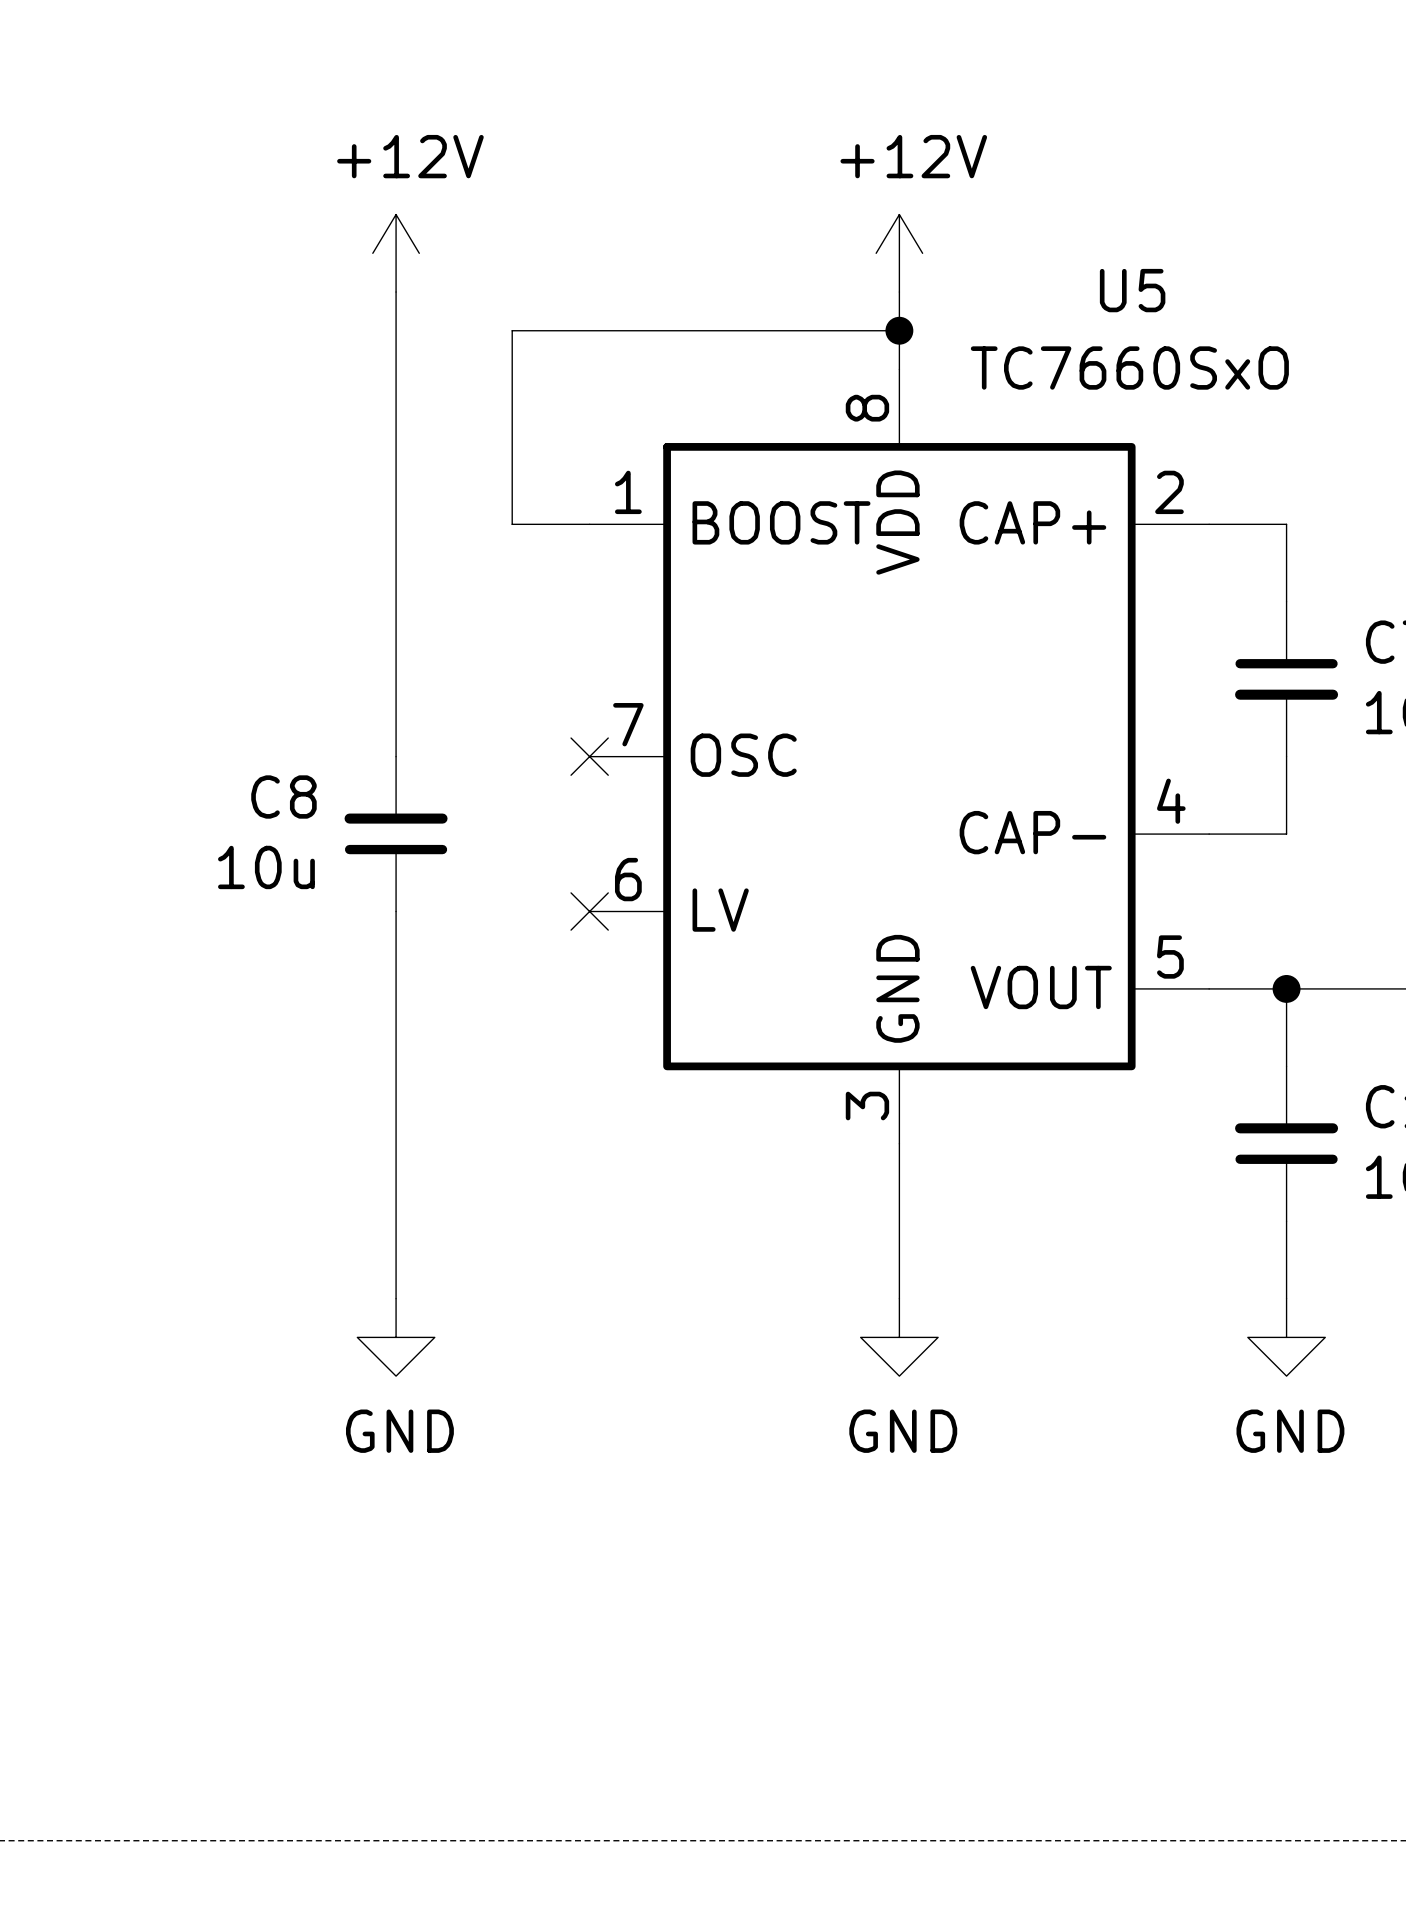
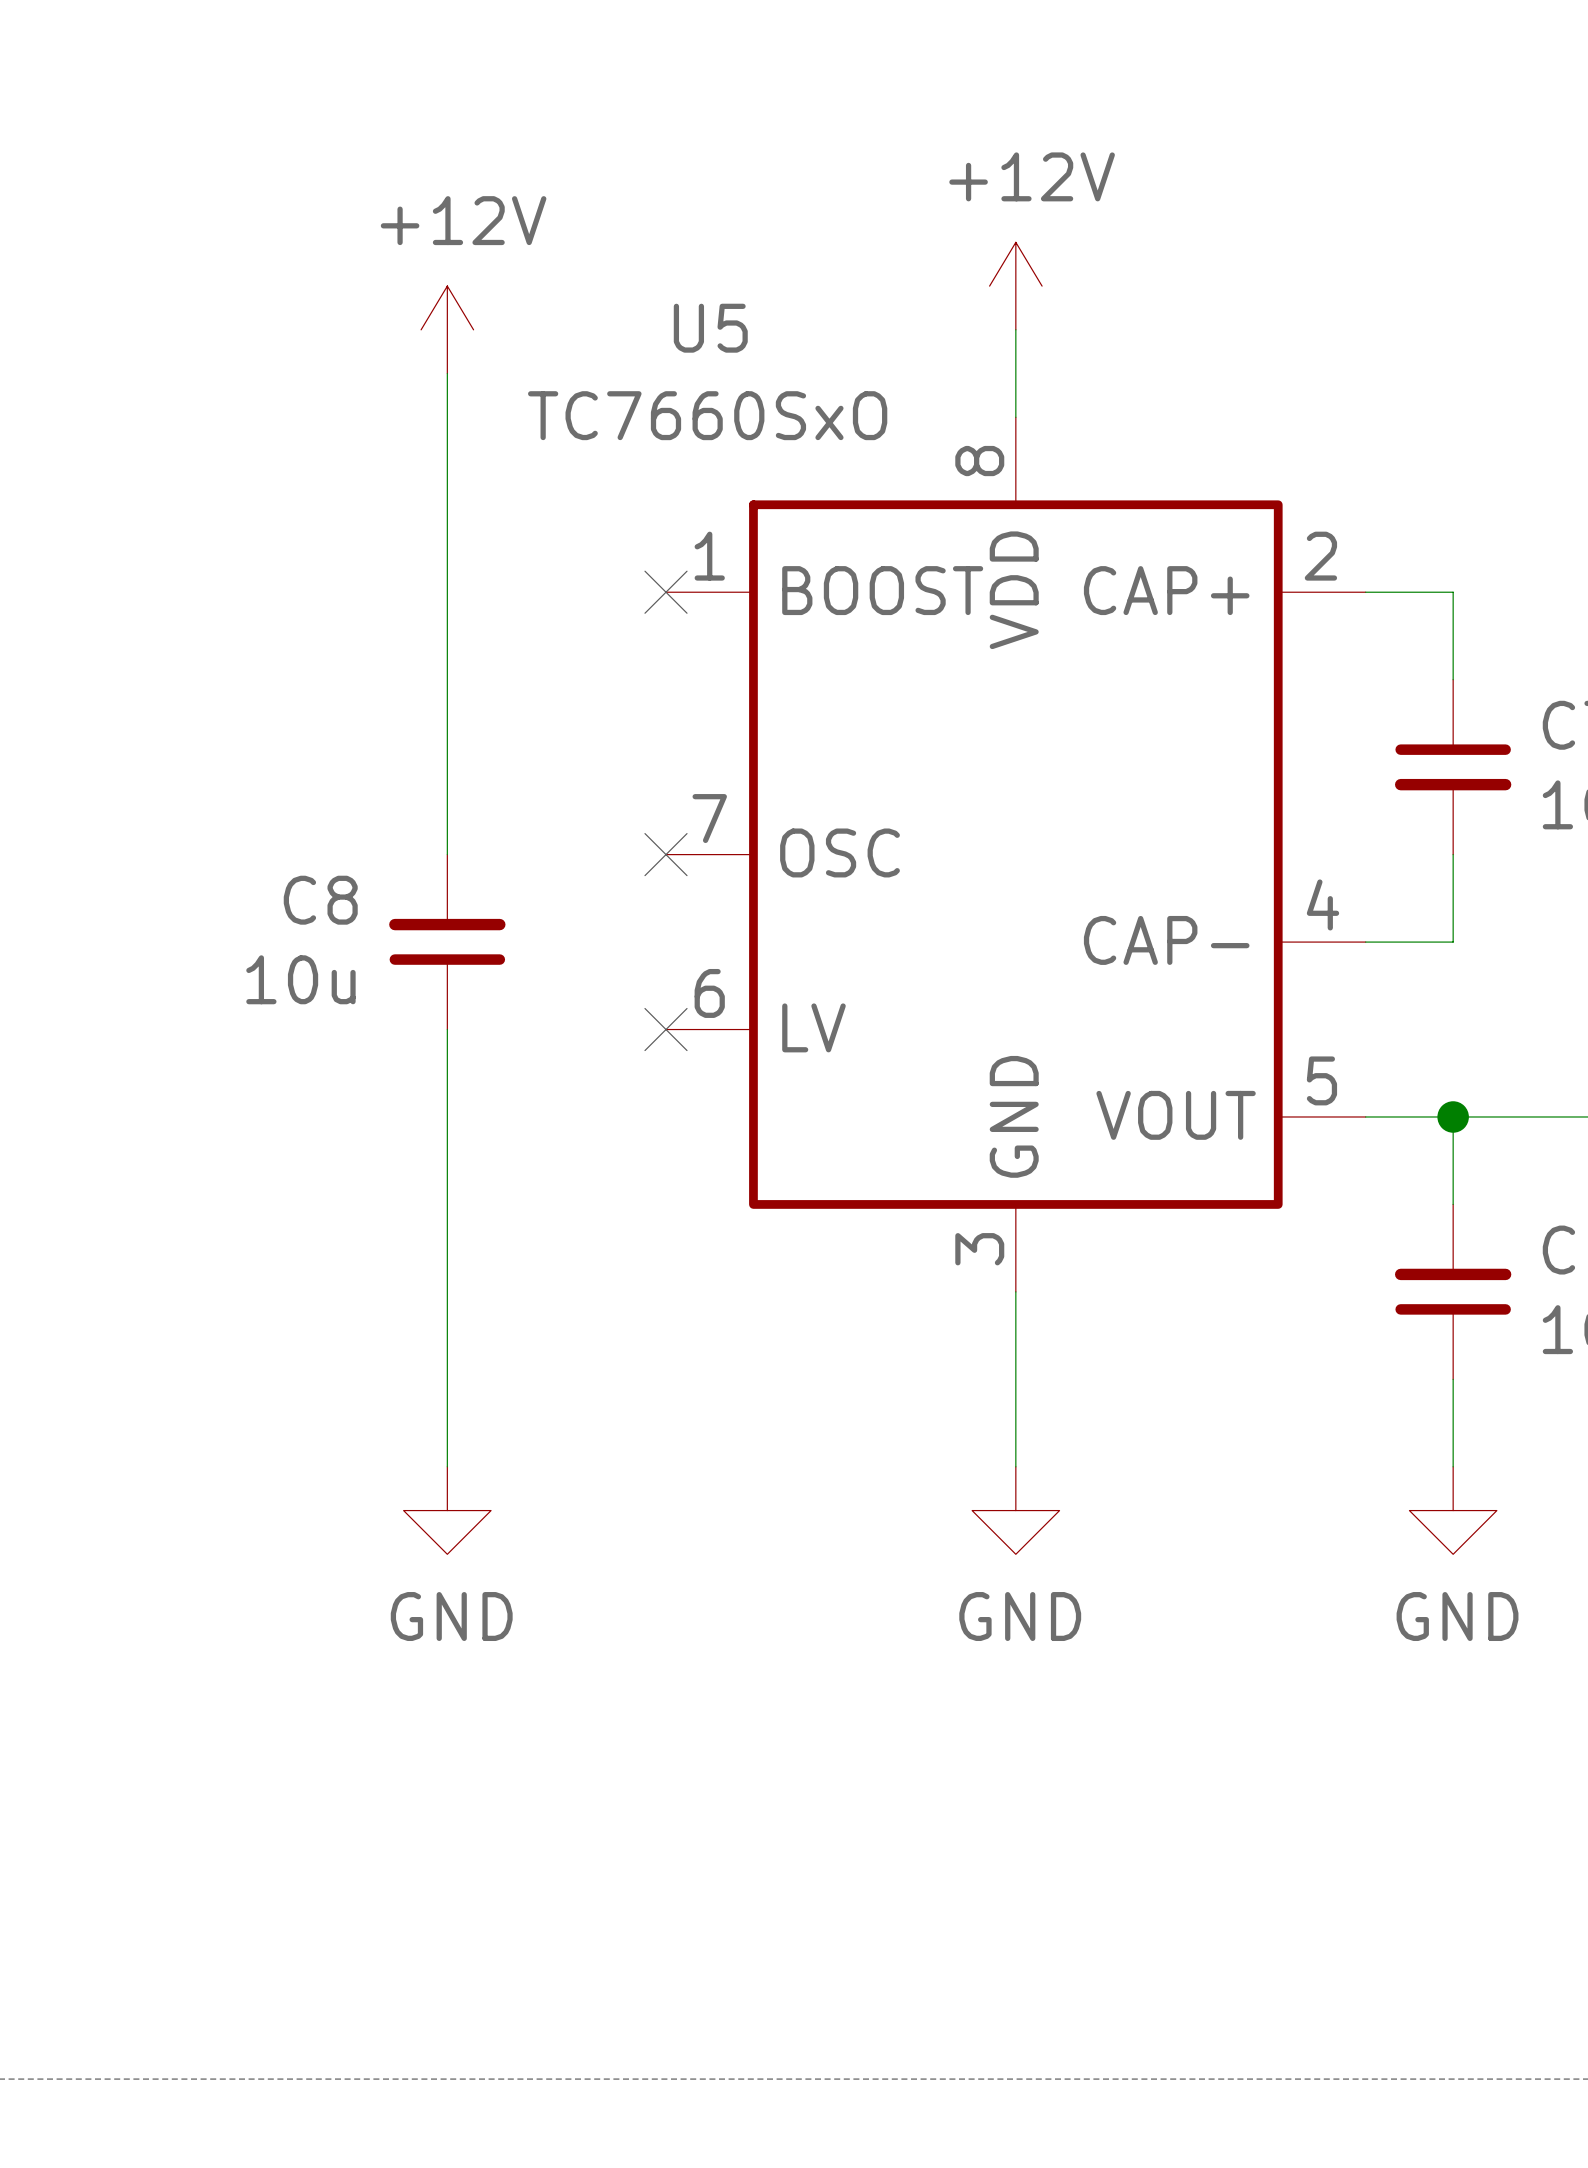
power symbol position: +12V (396, 253) -> +12V (447, 329)
U5 name position: U5 (1132, 290) -> U5 (710, 328)
wire: (899, 330) (512, 330) (512, 524) (589, 524) -> none
junction: (899, 330) -> none
U5 value position: TC7660SxO (1129, 368) -> TC7660SxO (707, 415)
no-connect mark: none -> (666, 592)

